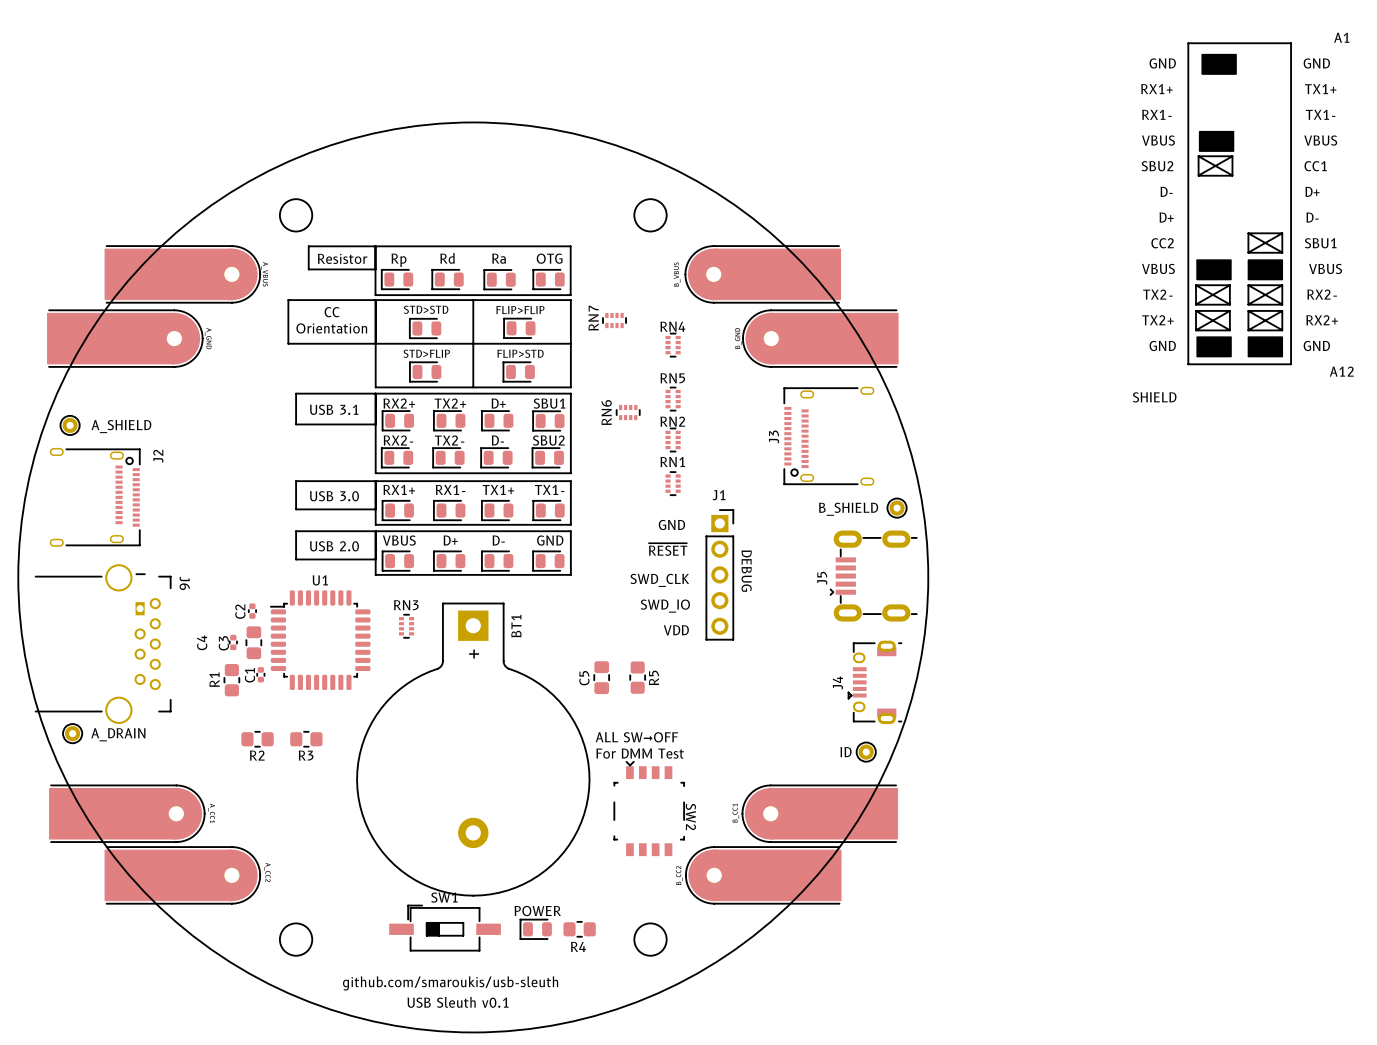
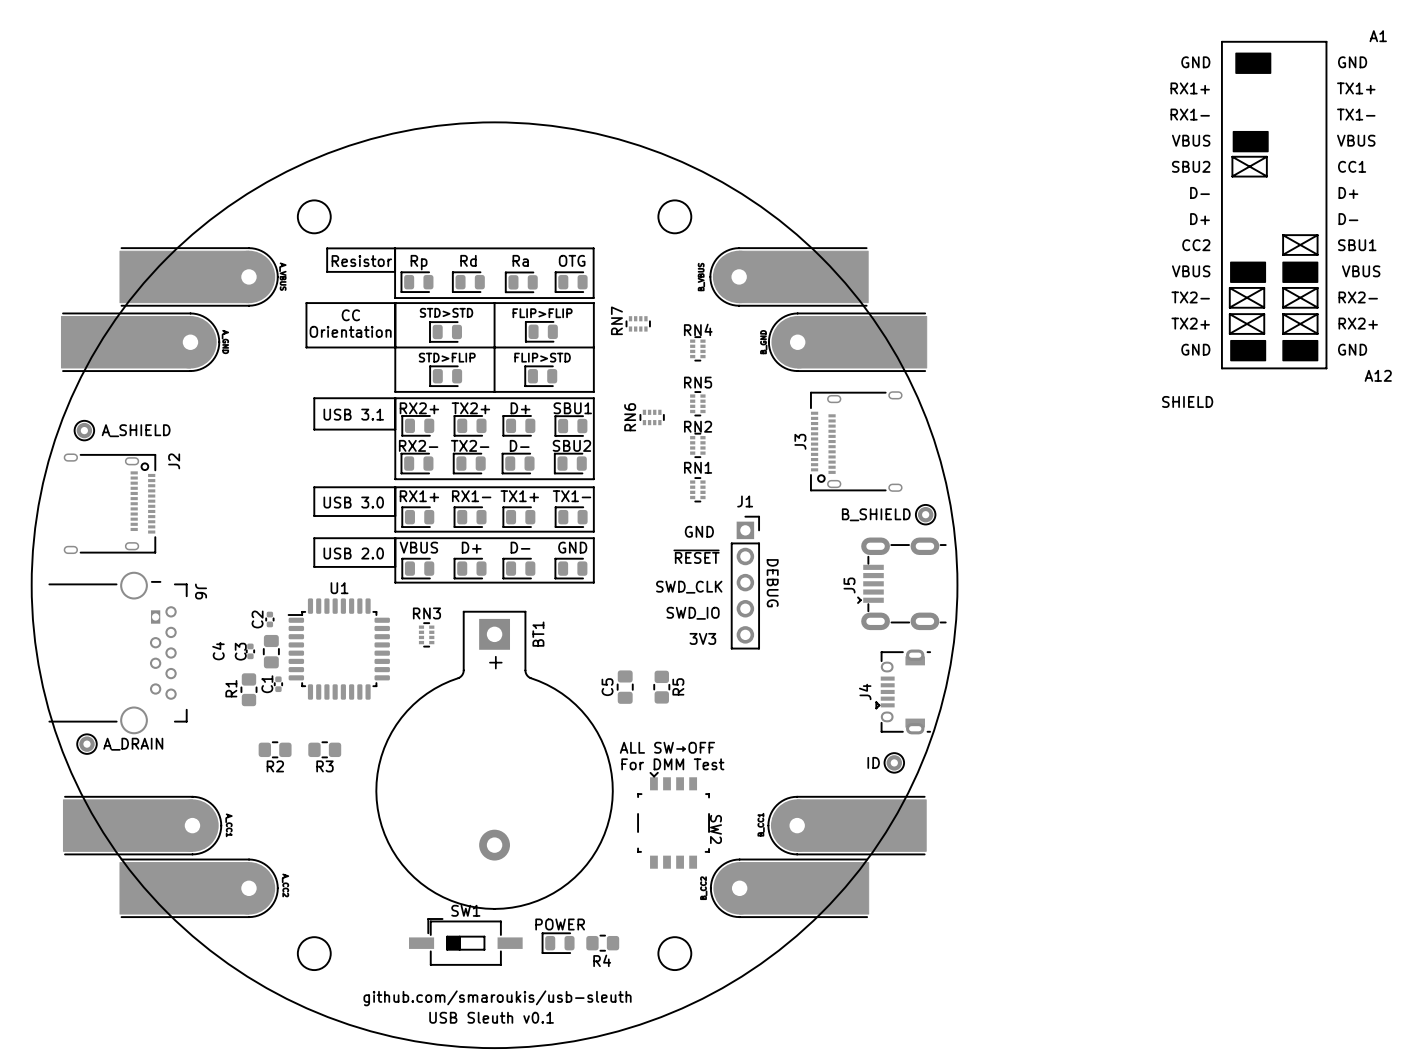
text: VDD (676, 630) -> 3V3 (702, 638)

